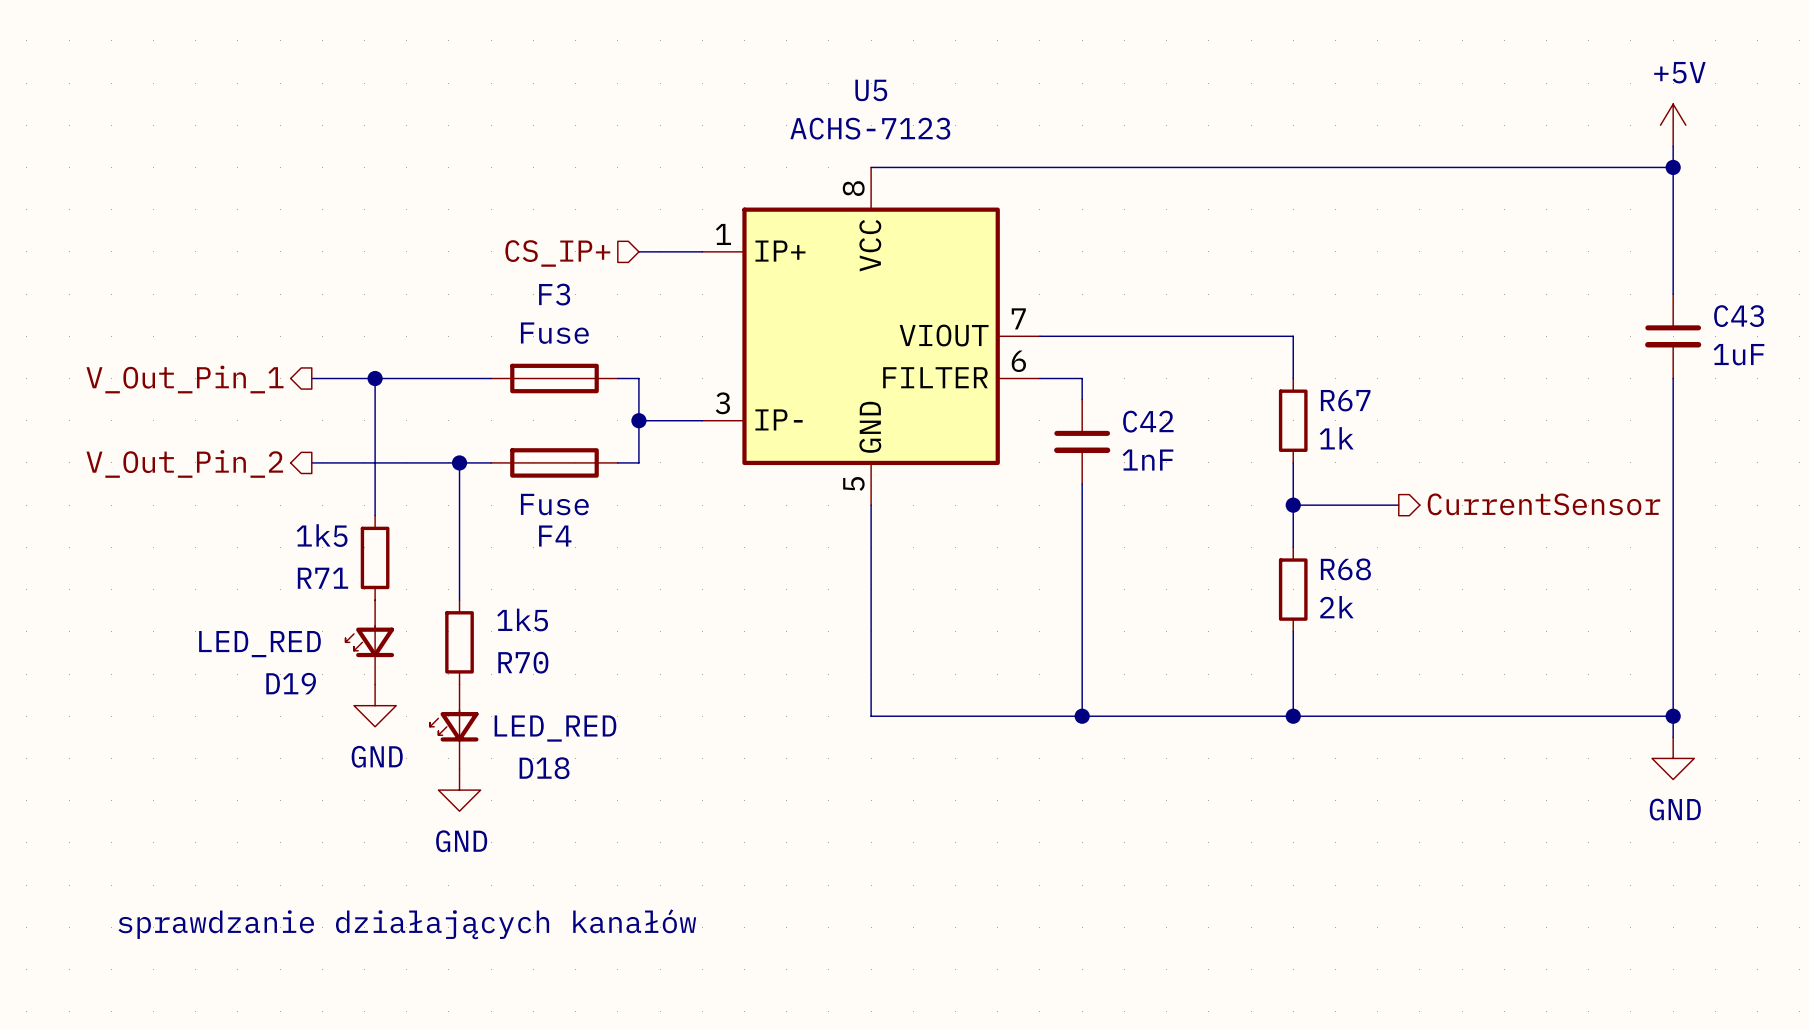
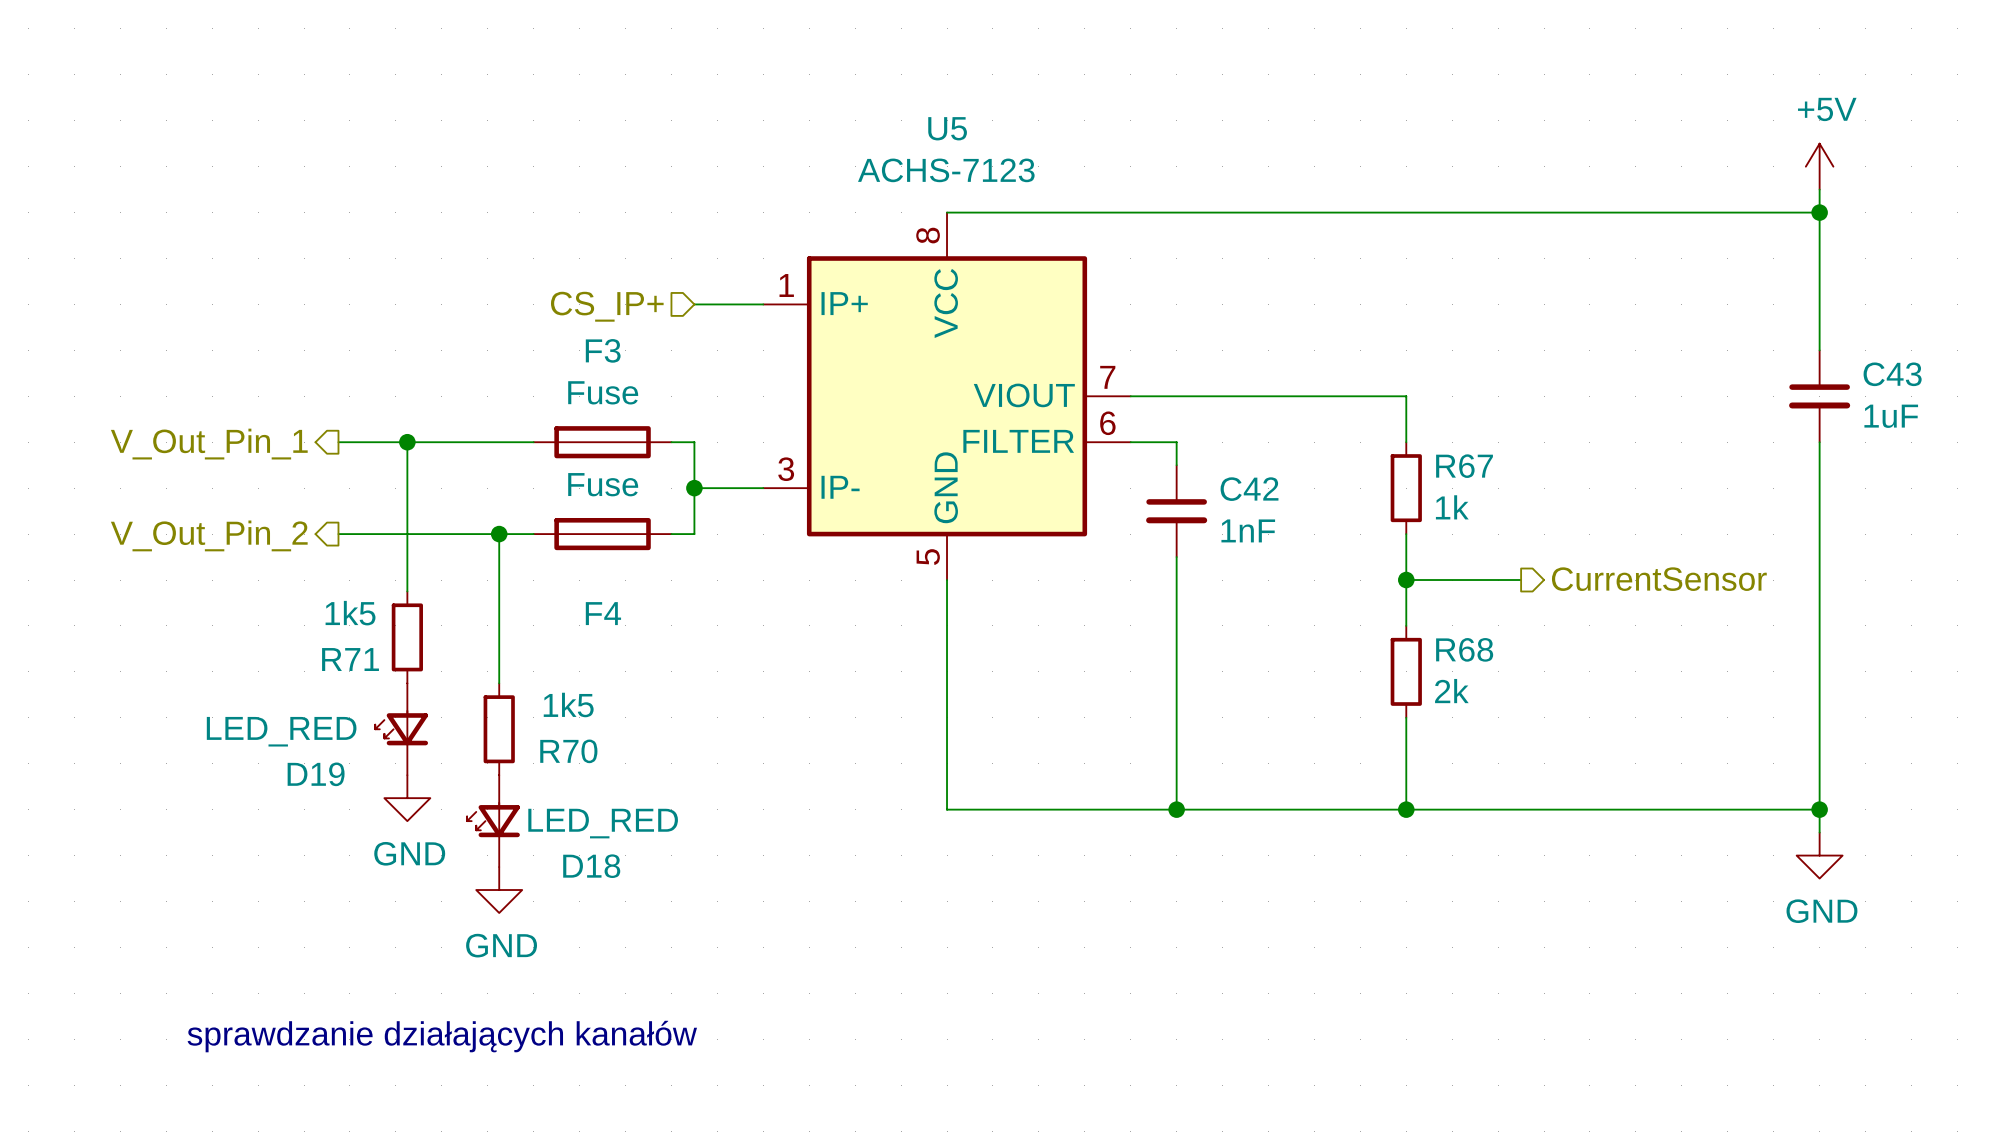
F4 value position: Fuse (554, 504) -> Fuse (603, 484)

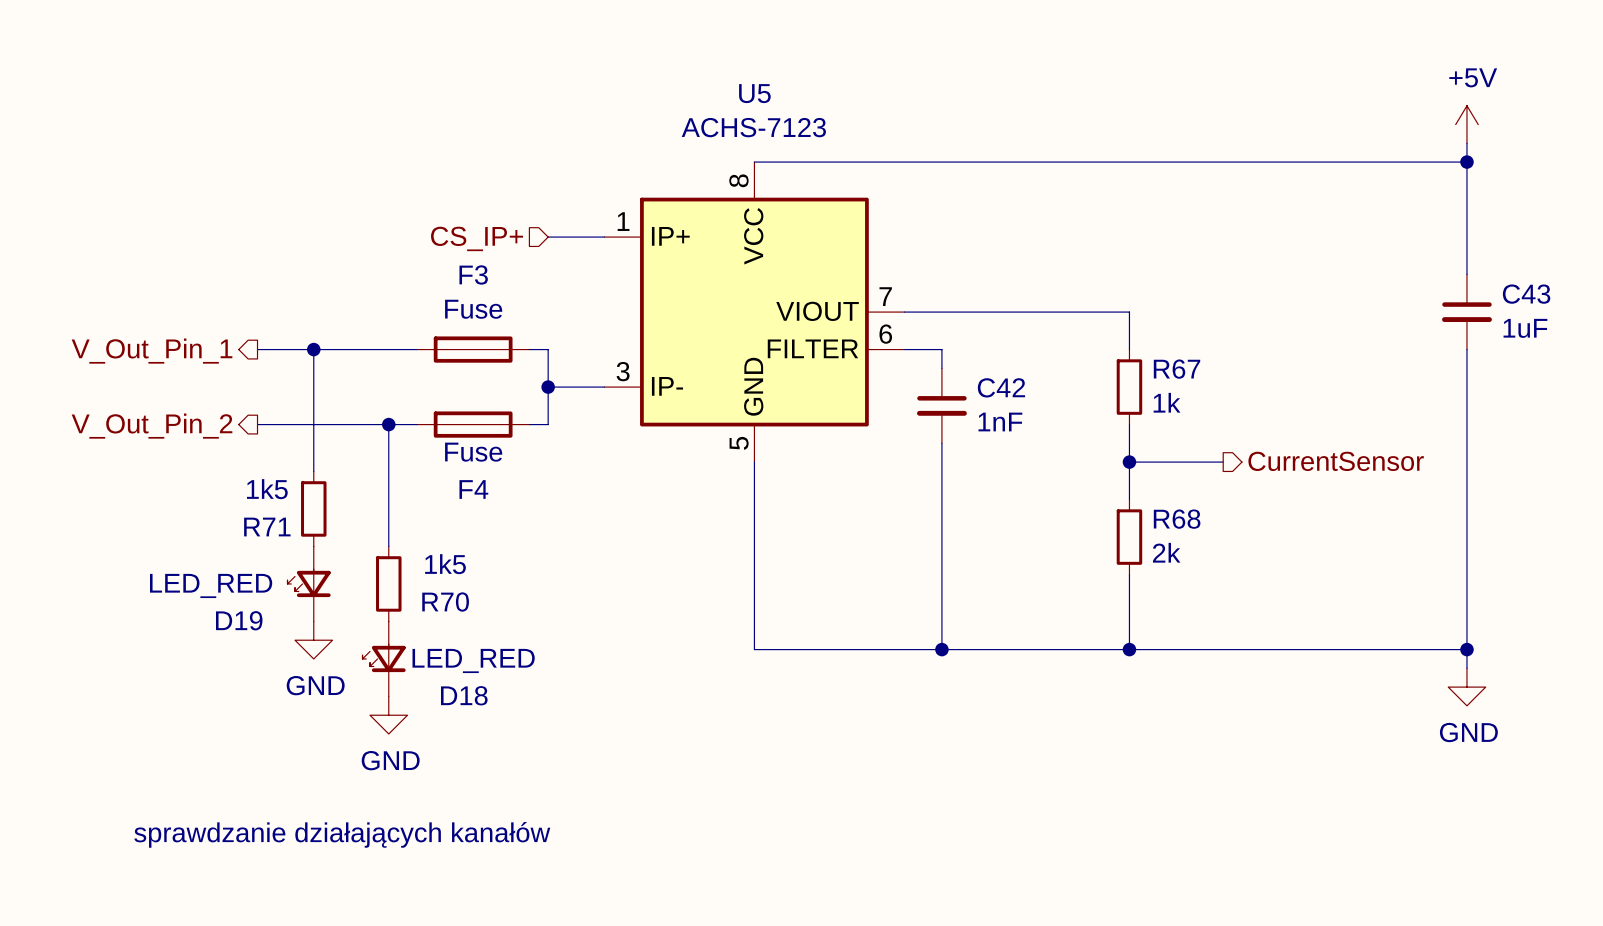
F4 value position: Fuse (603, 484) -> Fuse (473, 452)

